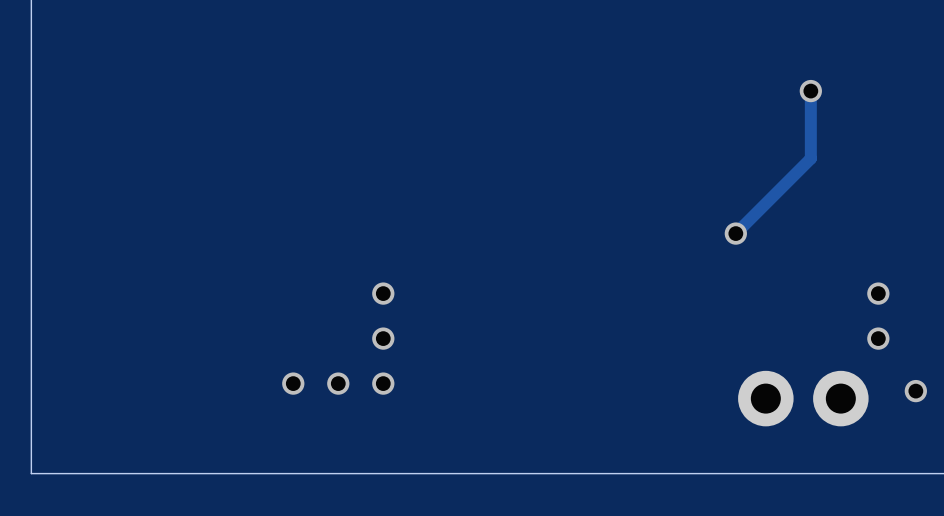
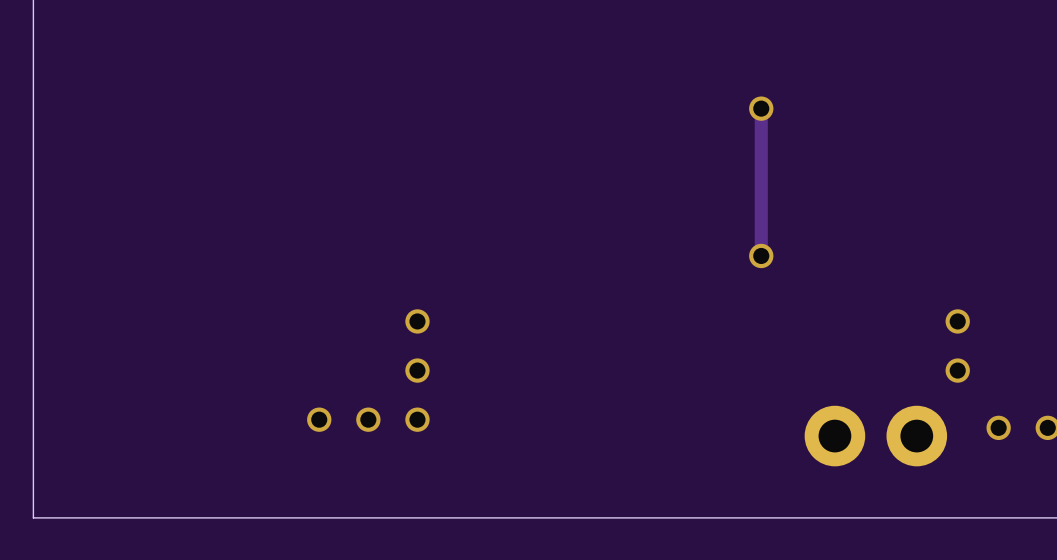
track: (810, 91) (810, 158) (735, 233) -> none
via: (810, 91) -> none
track: none -> (761, 108) (761, 255)
via: none -> (761, 108)
via position: (735, 233) -> (761, 255)

